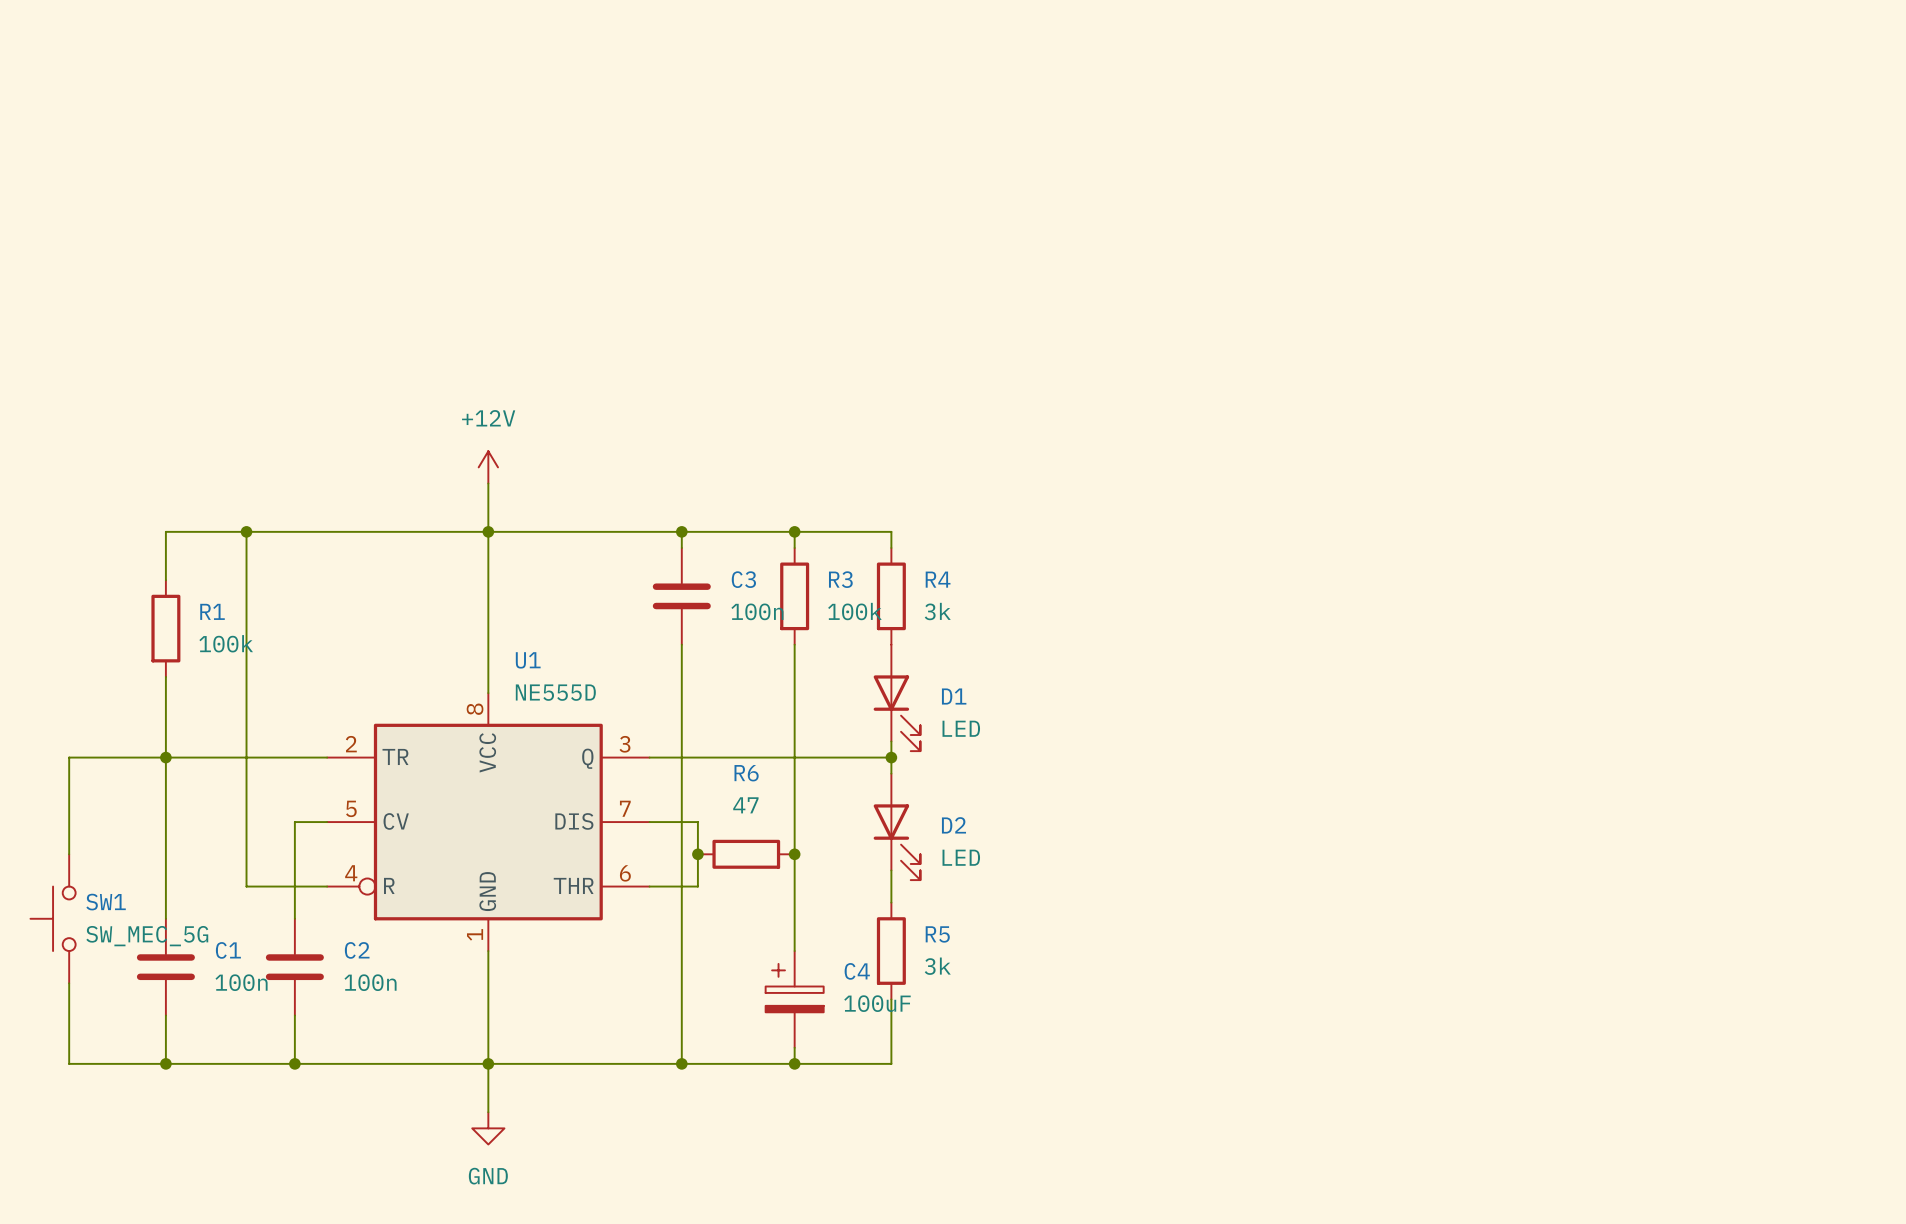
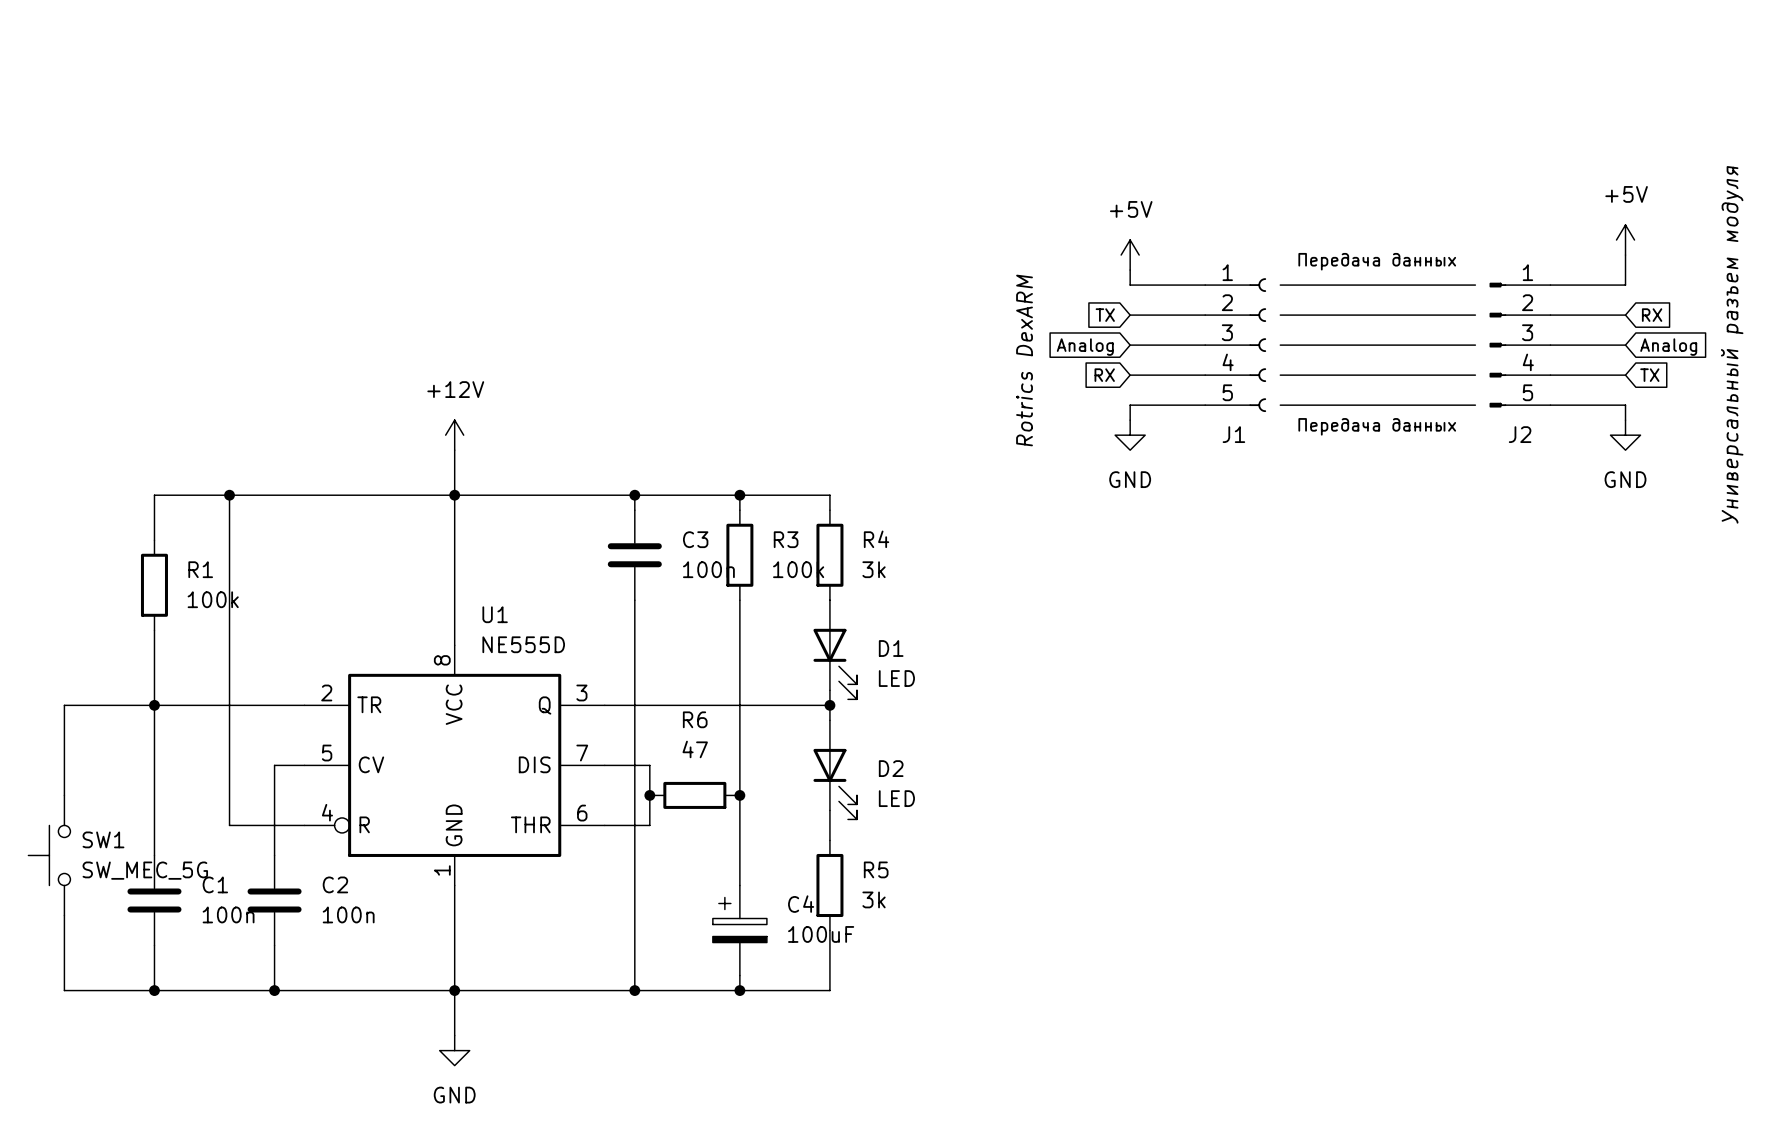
power symbol: none -> +5V (1625, 240)
power symbol: none -> +5V (1130, 255)
wire: none -> (1625, 255) (1625, 285) (1550, 285)
text: none -> Передача данных (1377, 261)
wire: none -> (1130, 270) (1130, 285) (1205, 285)
wire: none -> (1280, 285) (1475, 285)
global label: none -> TX (1105, 315)
wire: none -> (1130, 315) (1205, 315)
wire: none -> (1280, 315) (1475, 315)
wire: none -> (1550, 315) (1625, 315)
global label: none -> RX (1652, 315)
wire: none -> (1130, 345) (1205, 345)
J1: none -> Rotrics DexARM (1235, 345)
wire: none -> (1280, 345) (1475, 345)
J2: none -> Универсальный разъем модуля (1519, 345)
wire: none -> (1550, 345) (1625, 345)
global label: none -> Analog (1085, 347)
global label: none -> Analog (1668, 347)
global label: none -> RX (1104, 375)
wire: none -> (1130, 375) (1205, 375)
wire: none -> (1280, 375) (1475, 375)
wire: none -> (1550, 375) (1625, 375)
global label: none -> TX (1649, 375)
wire: none -> (1205, 405) (1130, 405) (1130, 420)
wire: none -> (1280, 405) (1475, 405)
wire: none -> (1550, 405) (1625, 405) (1625, 420)
text: none -> Передача данных (1377, 426)
power symbol: none -> GND (1130, 435)
power symbol: none -> GND (1625, 435)

